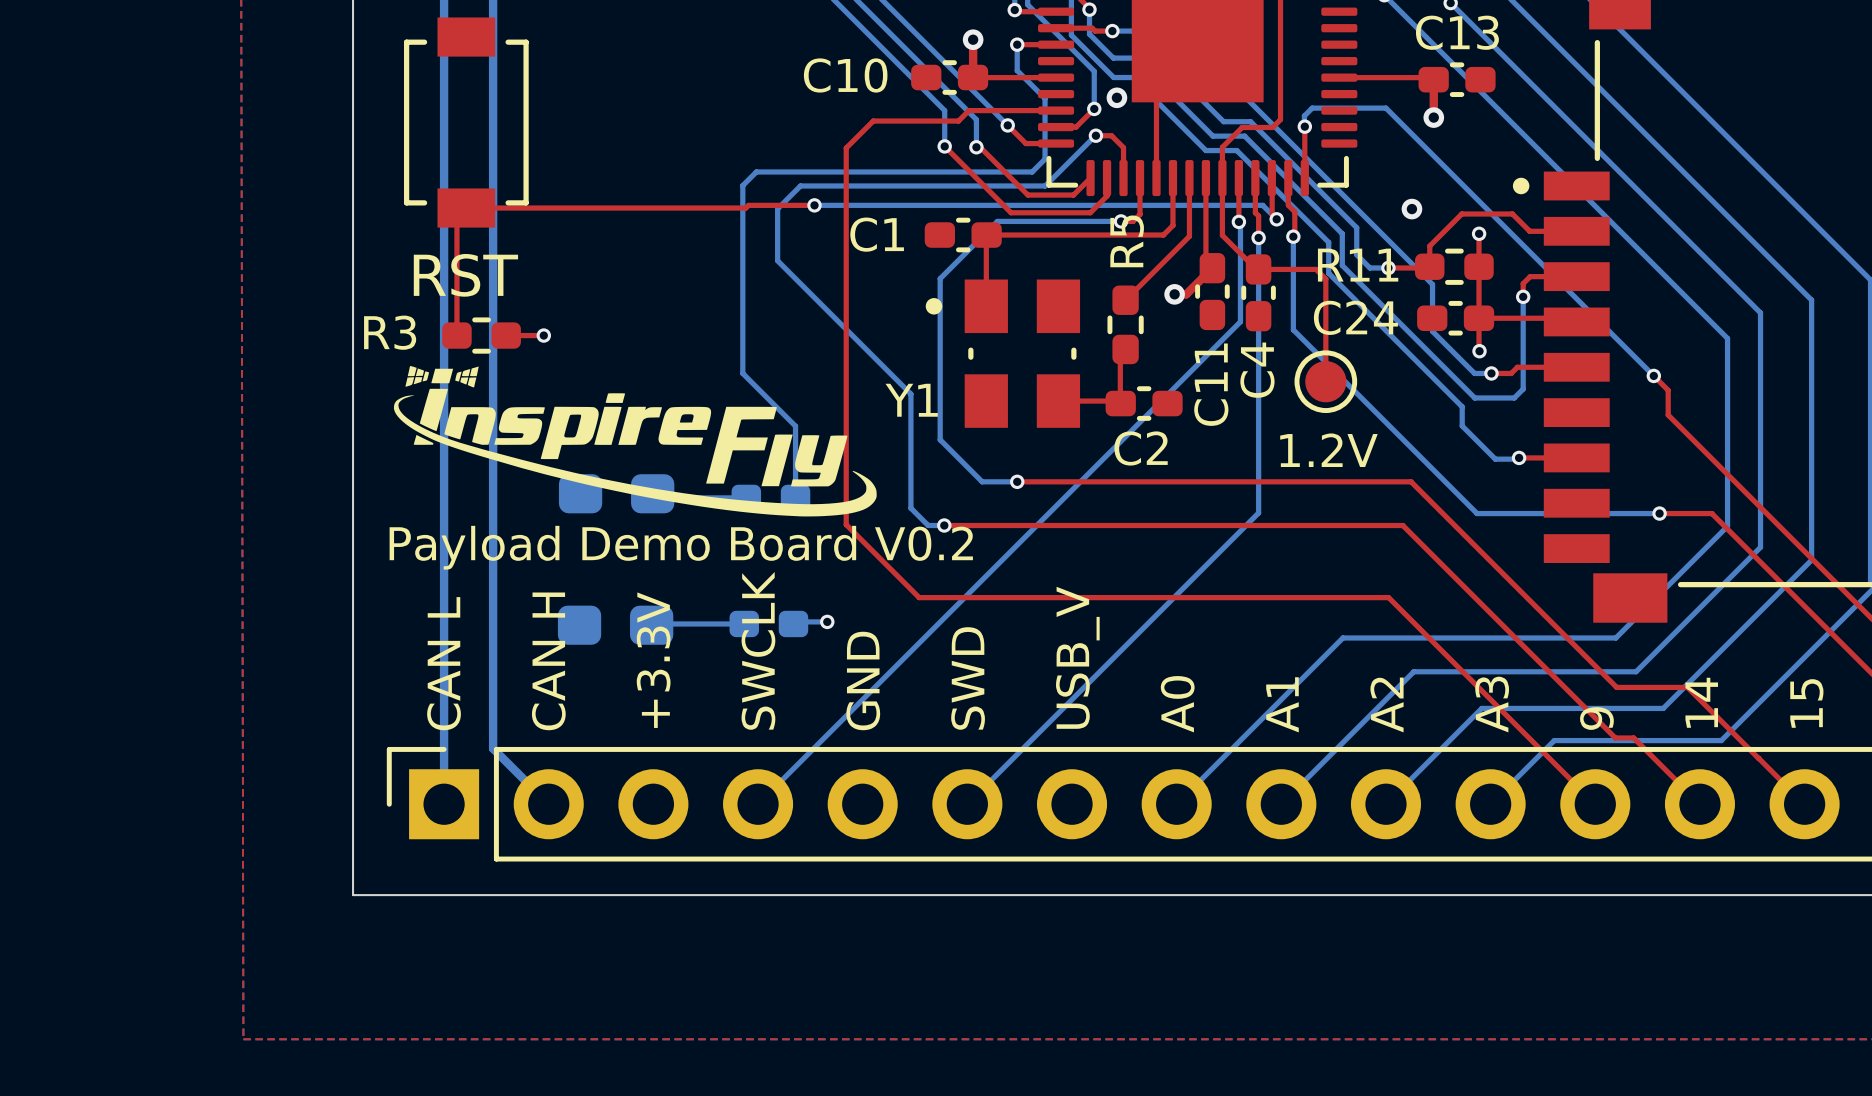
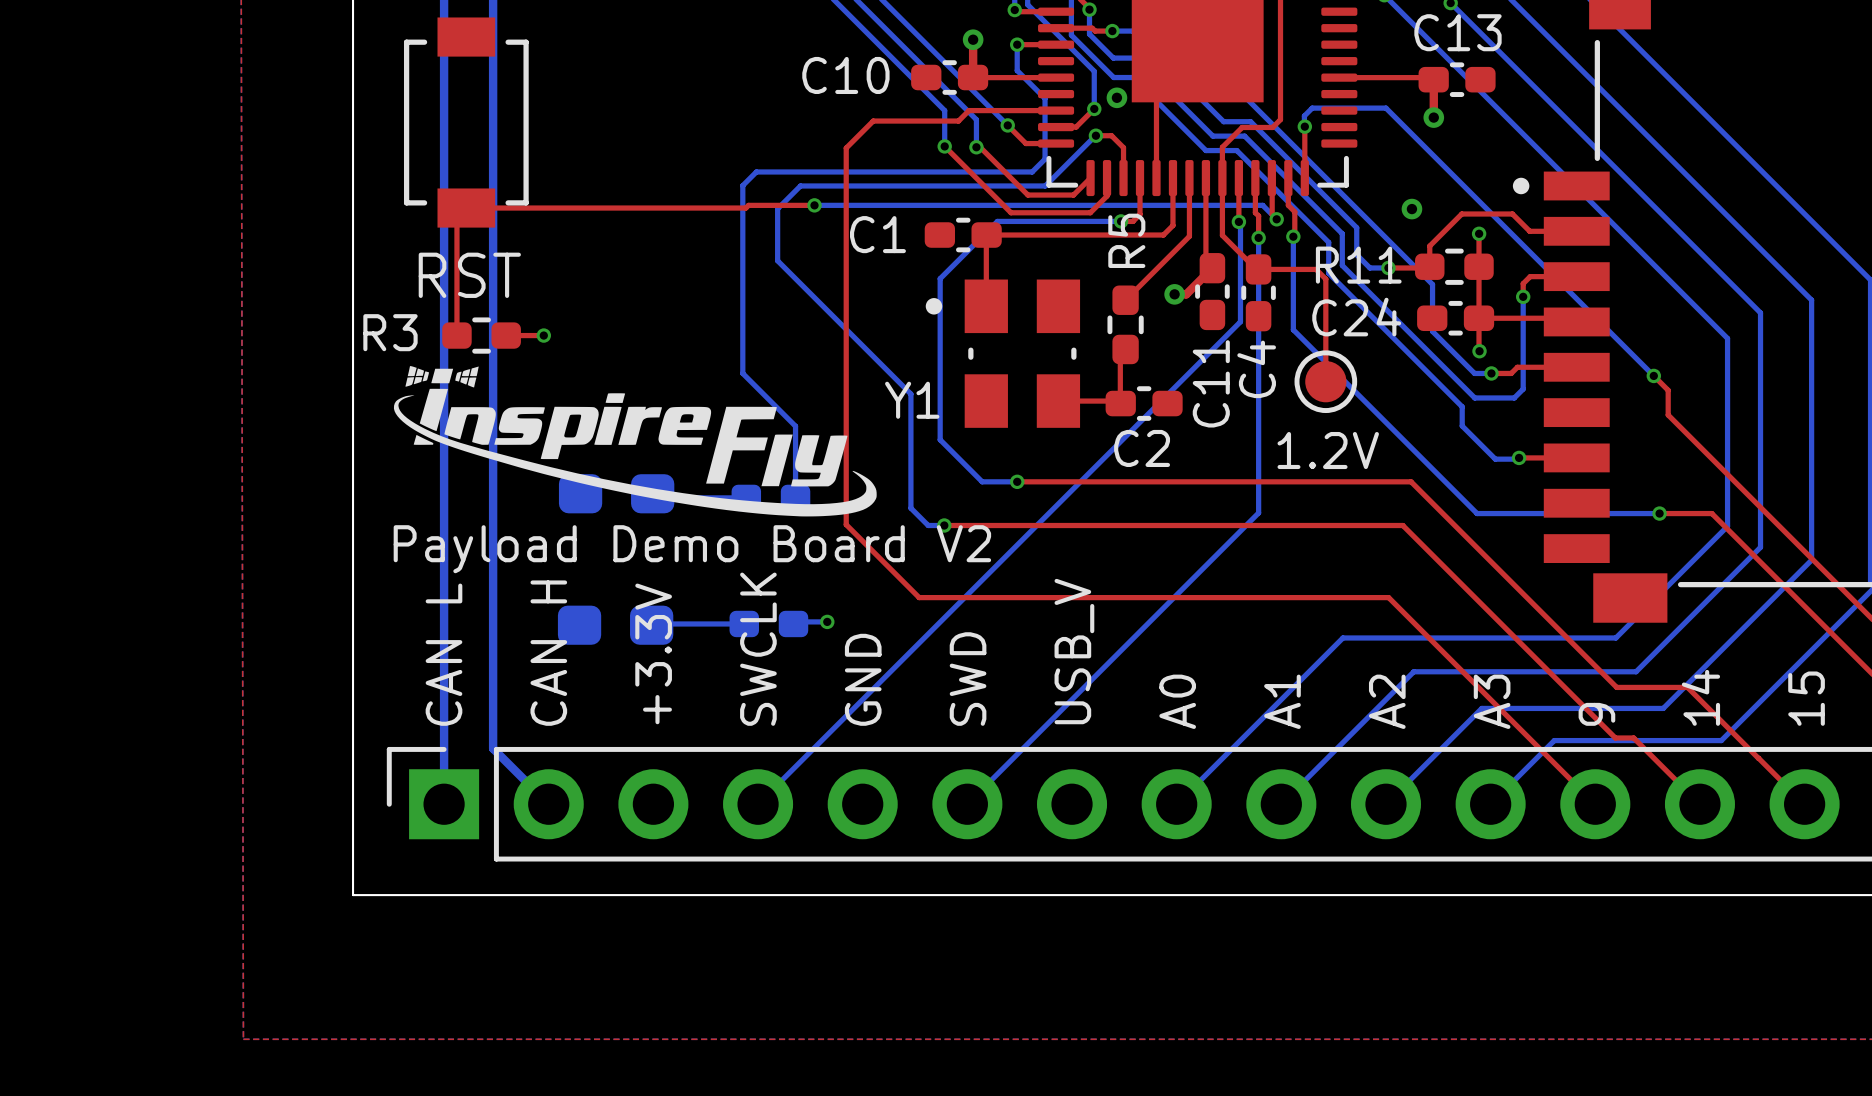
text: Payload Demo Board V0.2 (681, 547) -> Payload Demo Board V2 (692, 549)

